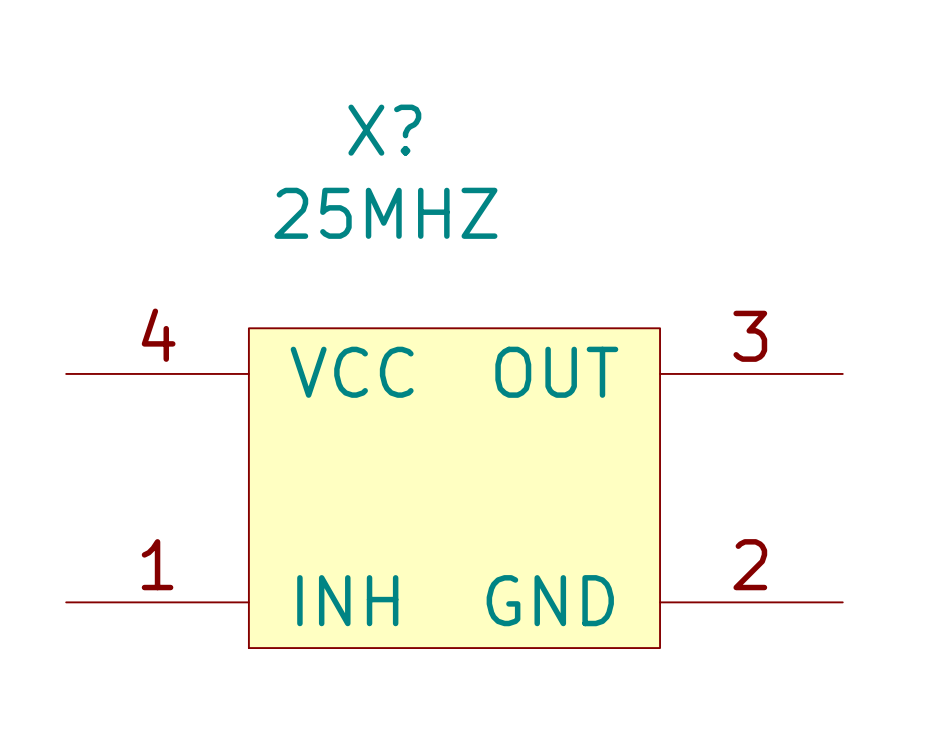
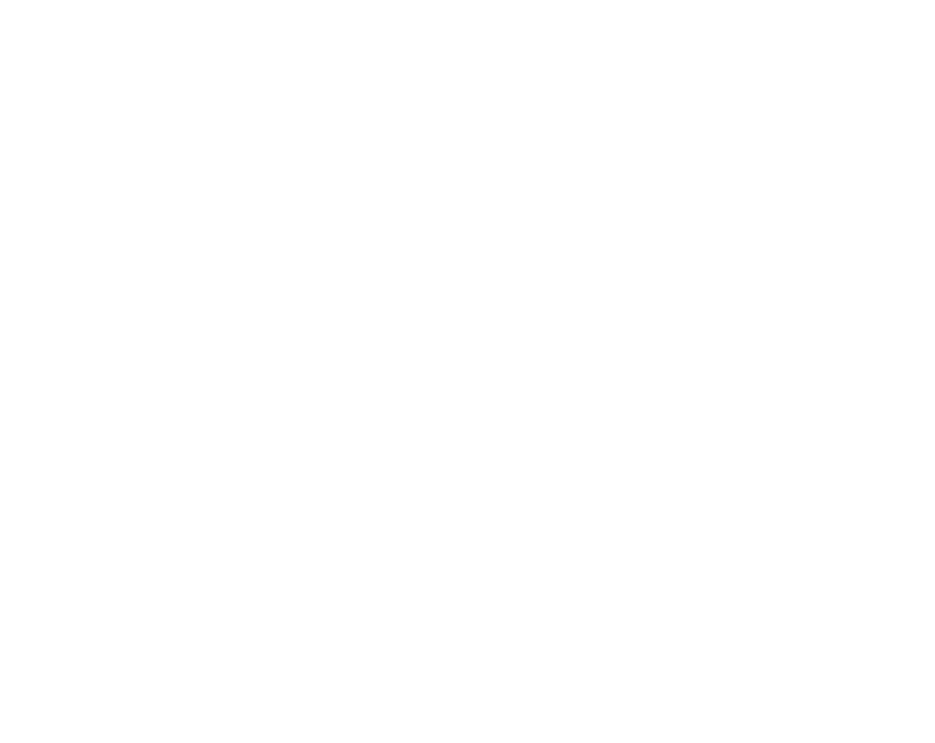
X?: (454, 488) -> none

